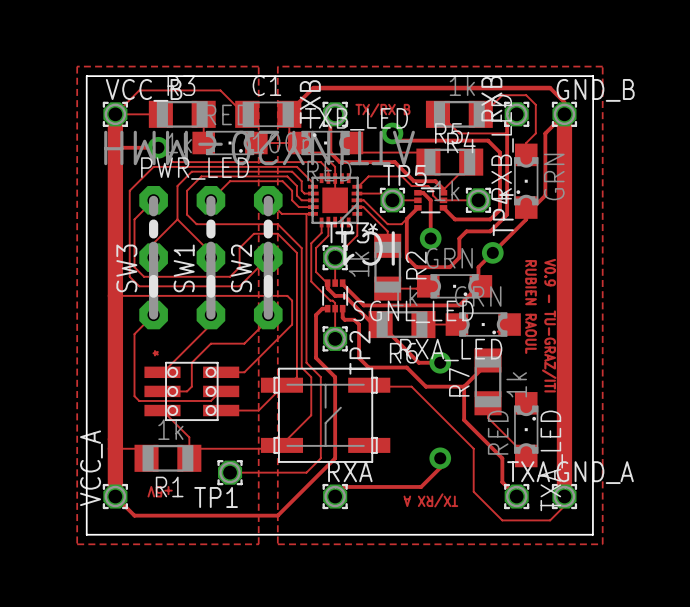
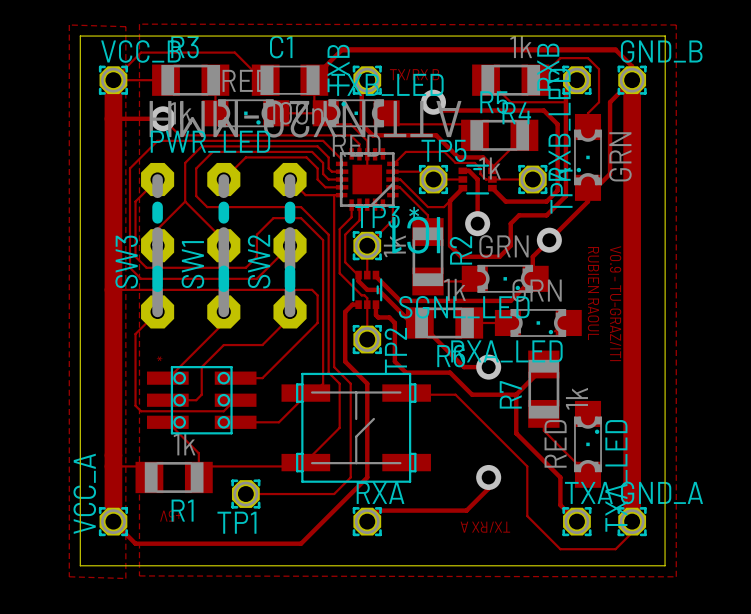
zone outline: (77, 66) (258, 66) (258, 544) (77, 544) -> (69, 25) (125, 26) (125, 578) (69, 576)
zone outline: (602, 66) (277, 66) (277, 544) (602, 544) -> (676, 25) (139, 24) (139, 575) (676, 576)

